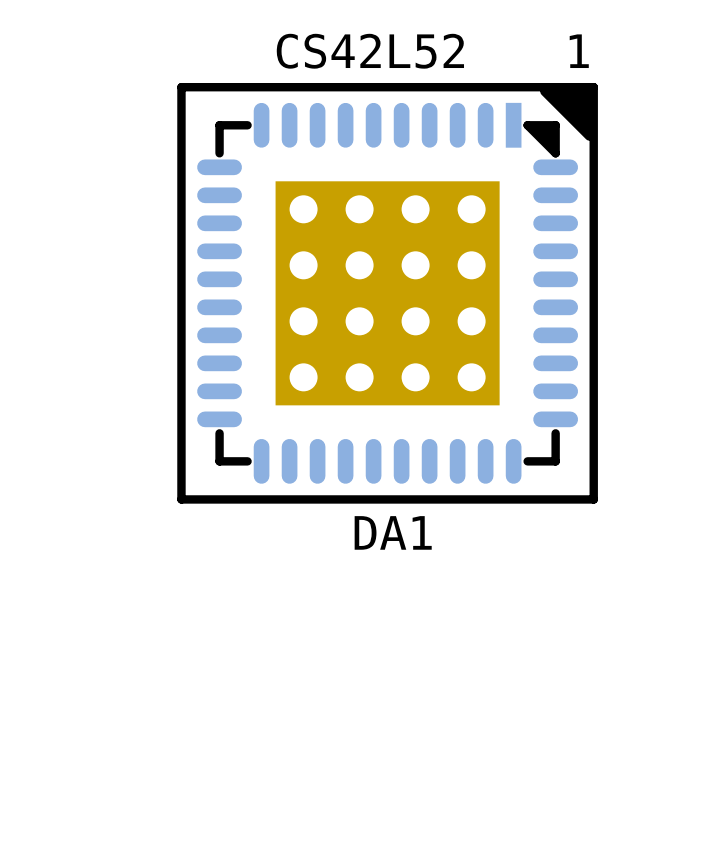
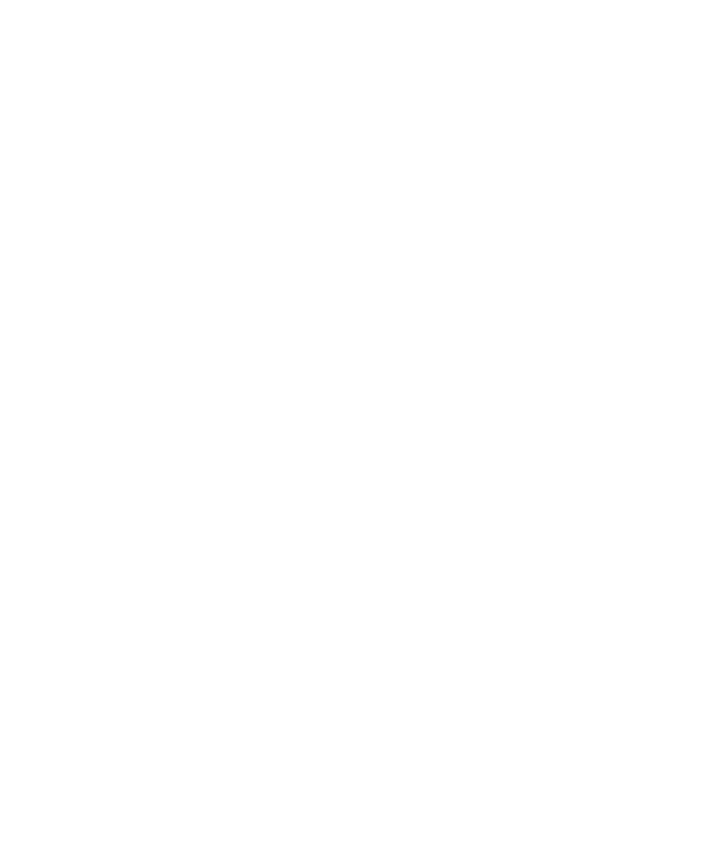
DA1: CS42L52 (387, 293) -> none

